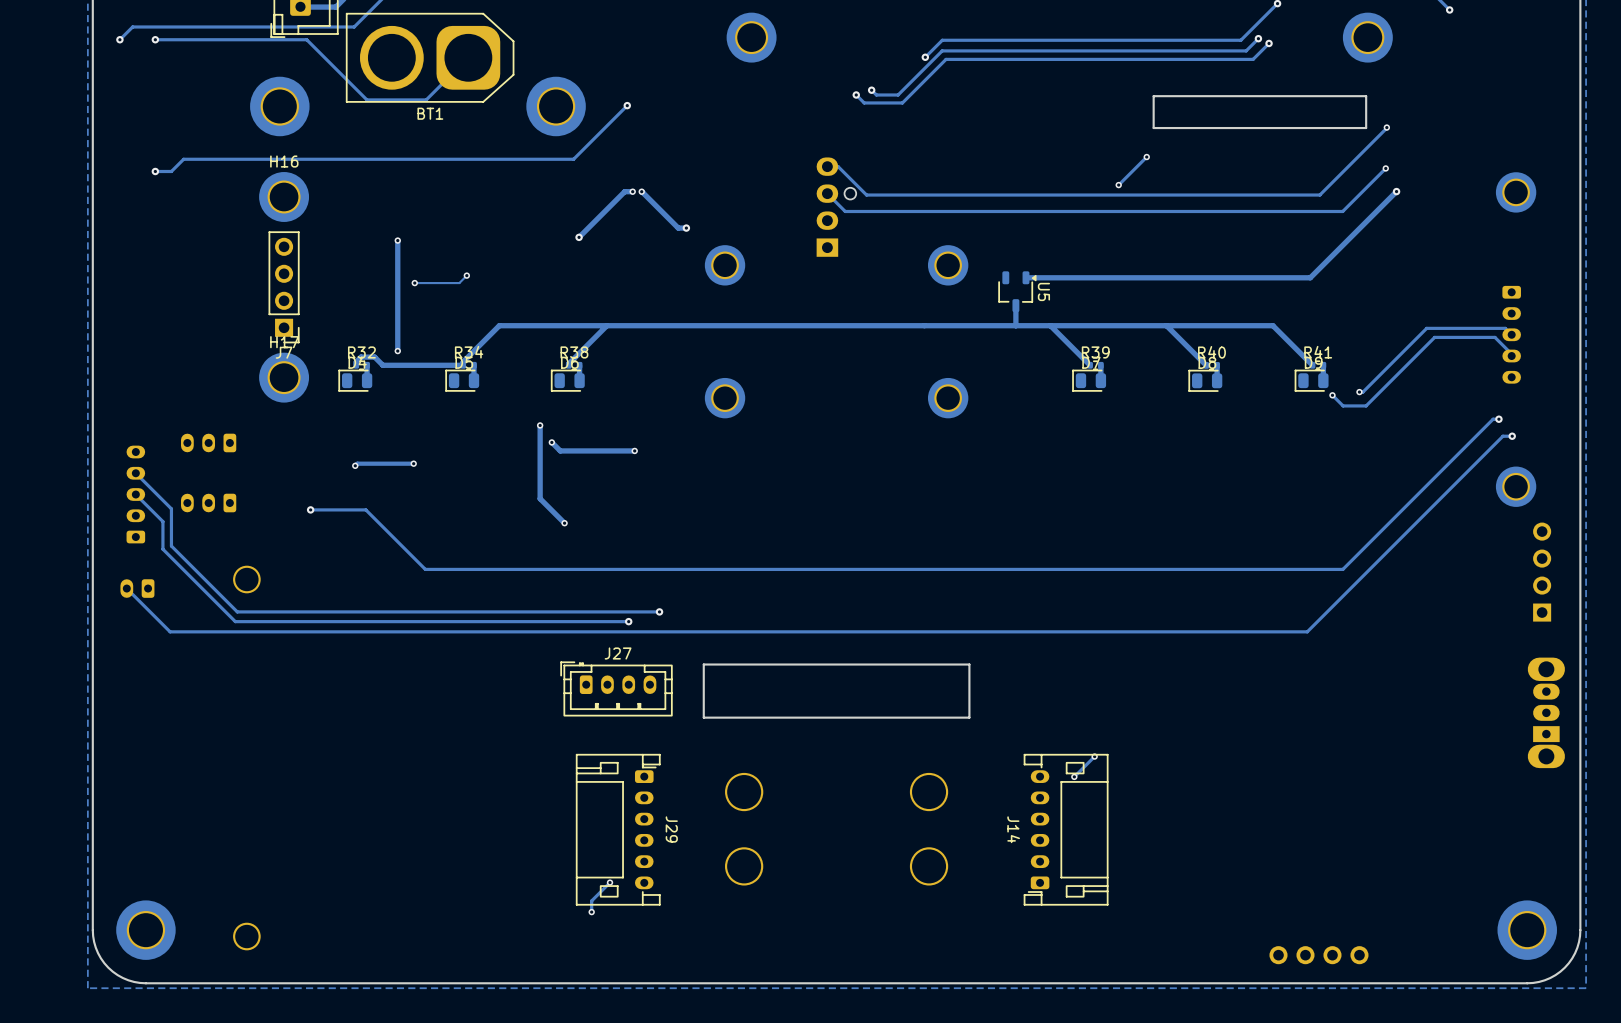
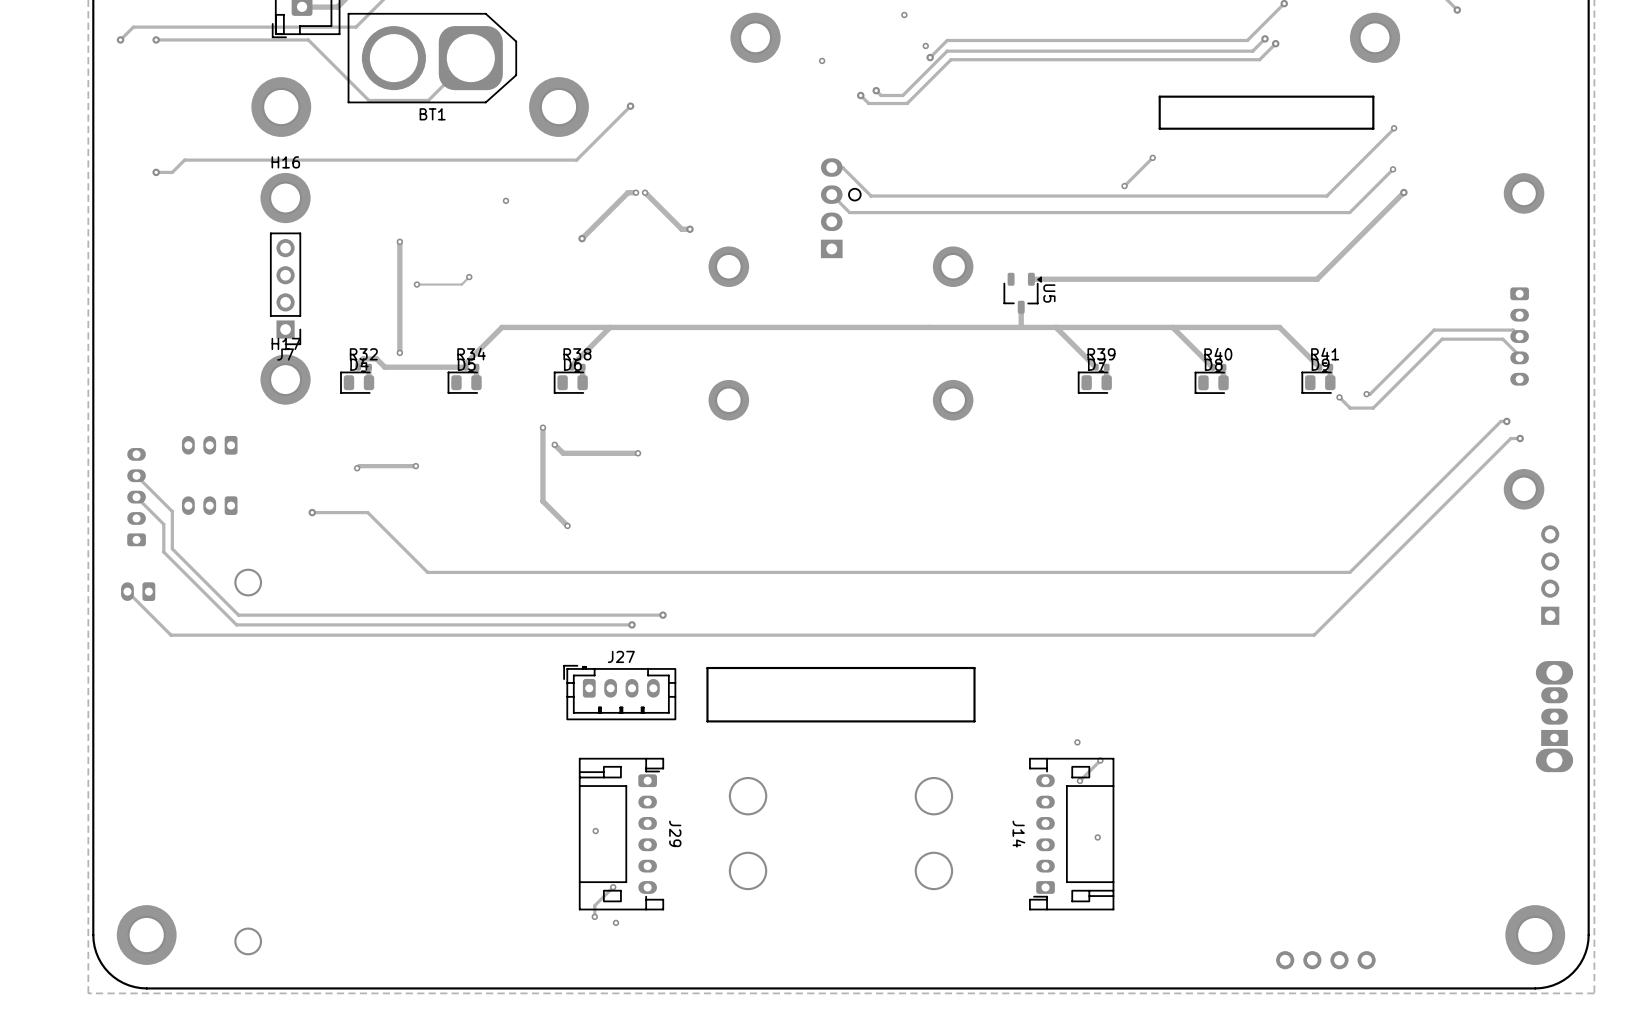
via: none -> (904, 15)
via: none -> (925, 45)
via: none -> (822, 60)
via: none -> (505, 200)
via: none -> (1077, 742)
via: none -> (595, 831)
via: none -> (1097, 837)
via: none -> (615, 922)

